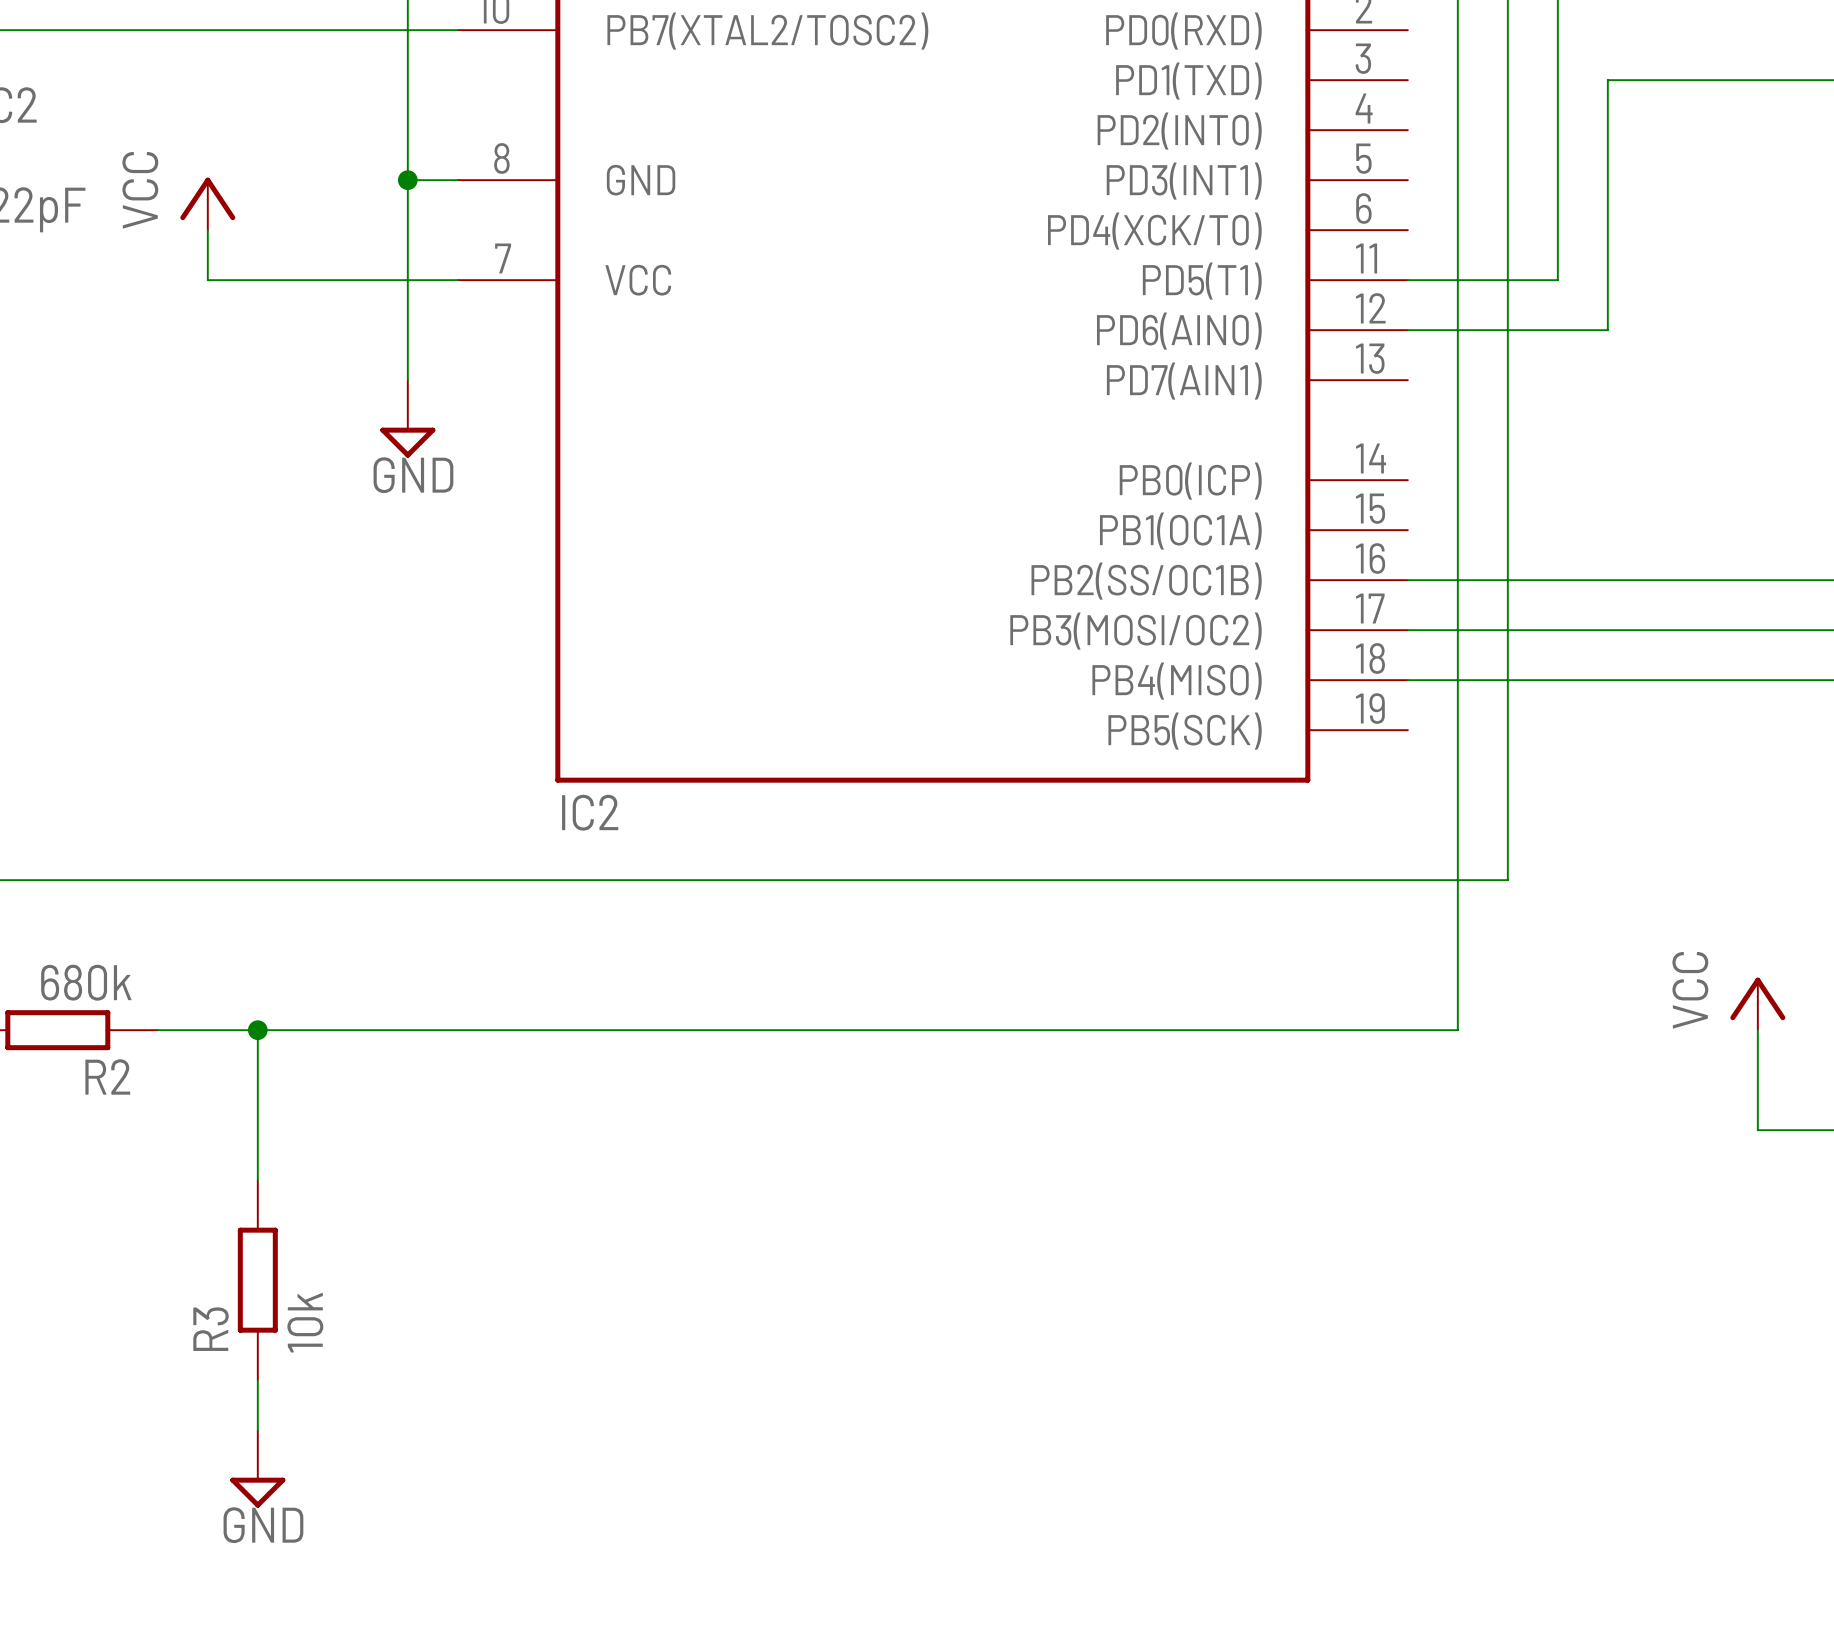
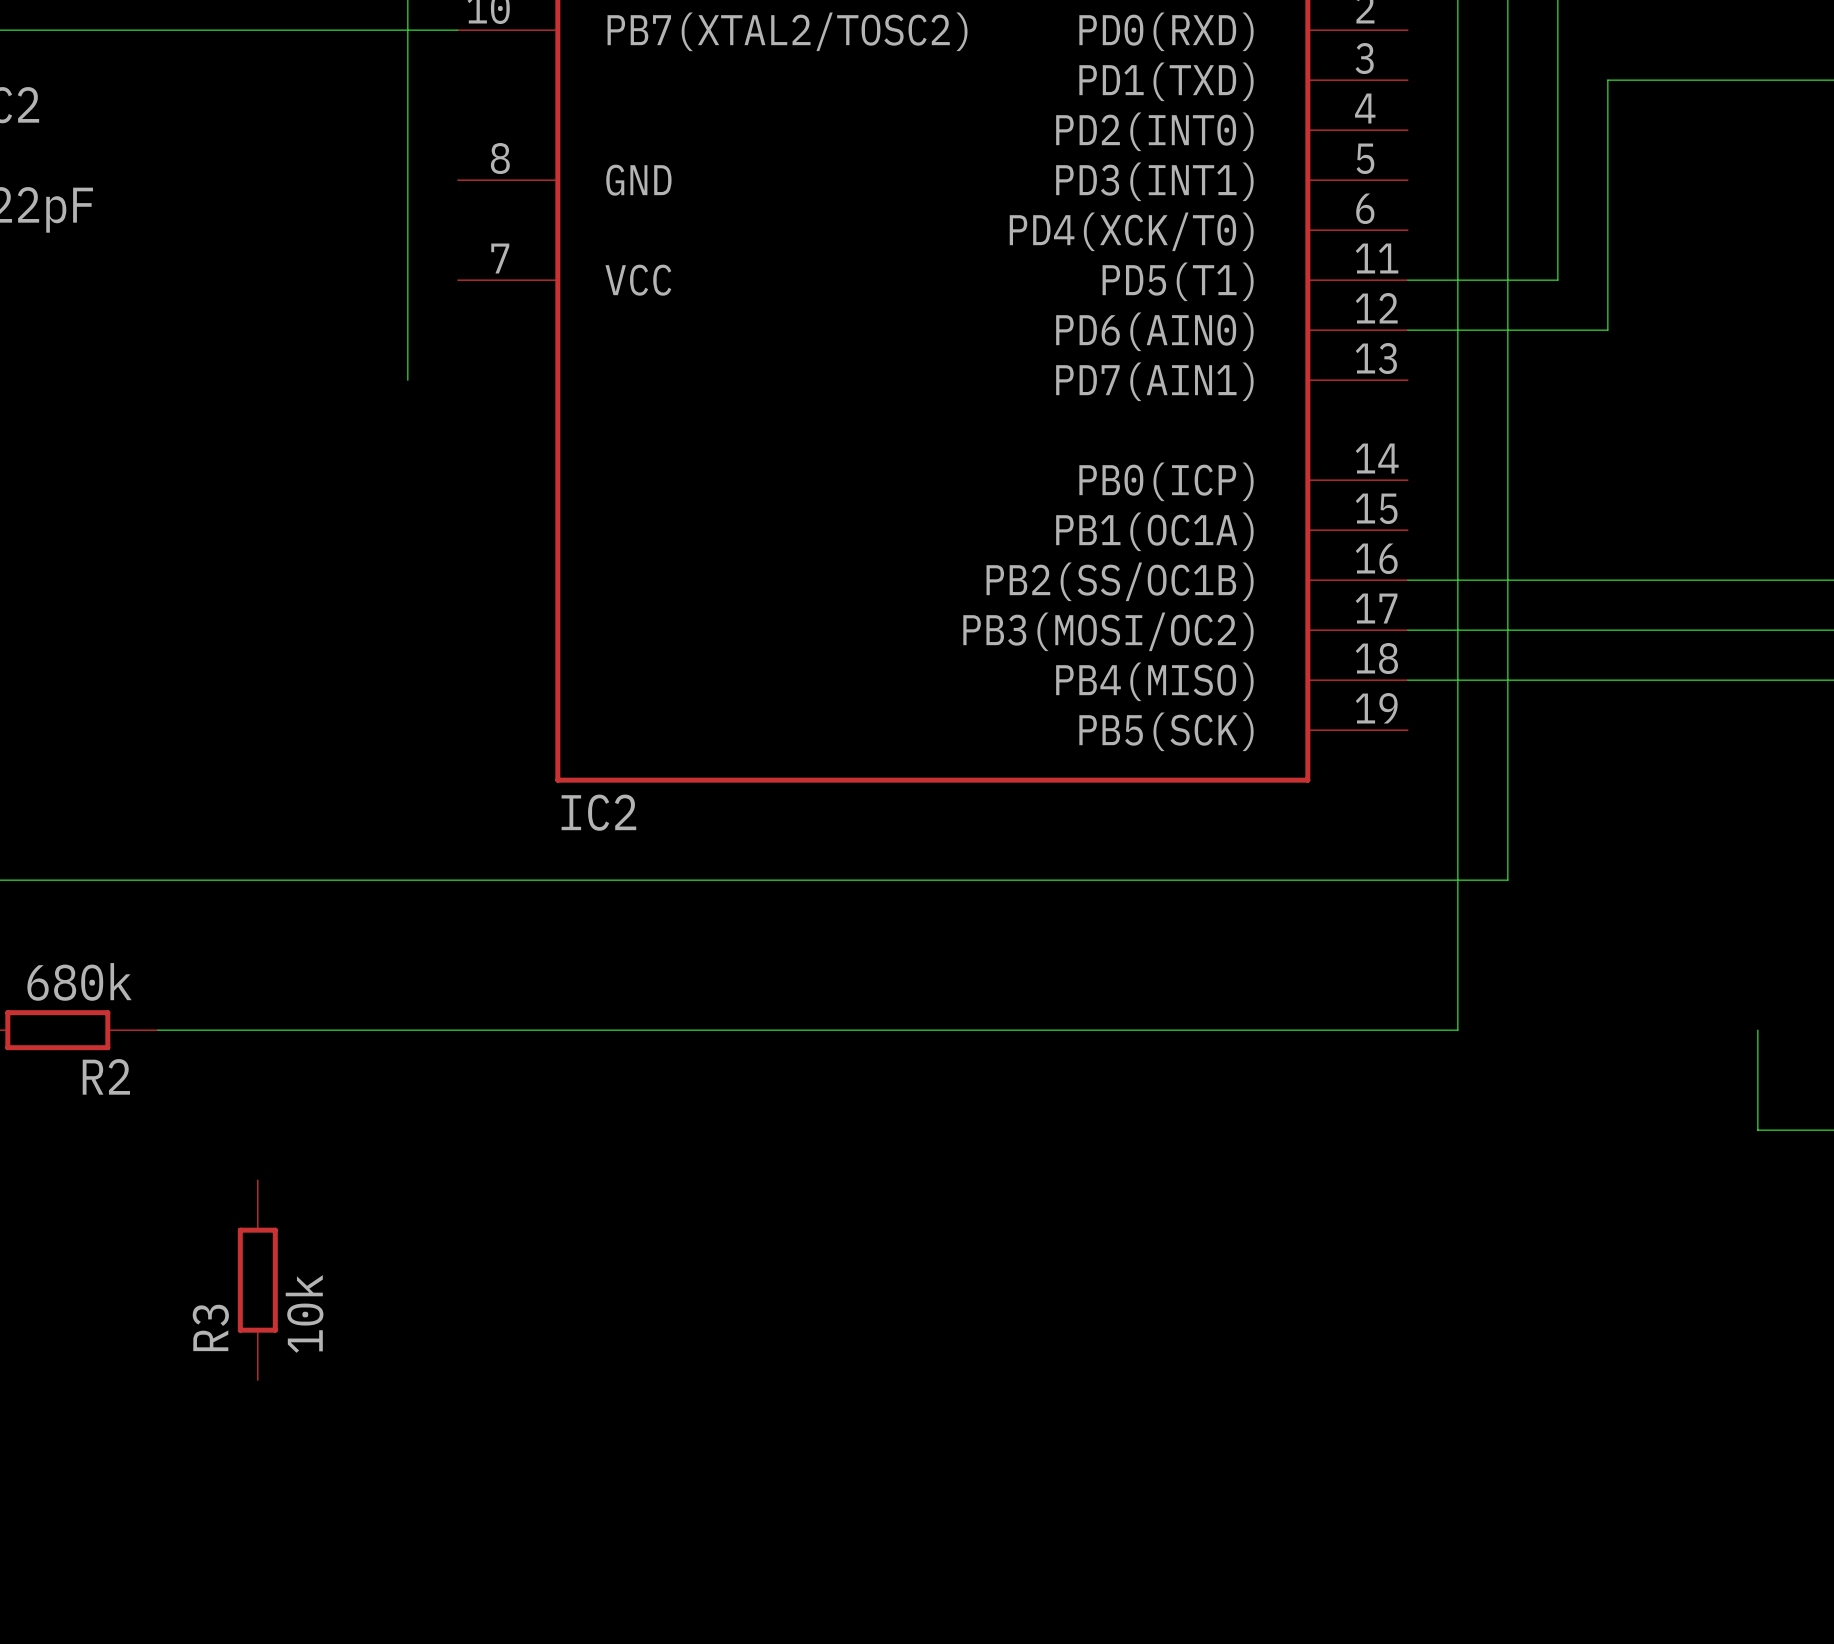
wire: (407, 180) (457, 180) -> none
junction: (407, 180) -> none
power symbol: VCC (207, 203) -> none
wire: (207, 230) (207, 280) (457, 280) -> none
power symbol: GND (407, 418) -> none
power symbol: VCC (1757, 1003) -> none
wire: (257, 1030) (257, 1180) -> none
junction: (257, 1030) -> none
wire: (257, 1380) (257, 1430) -> none
power symbol: GND (257, 1468) -> none

